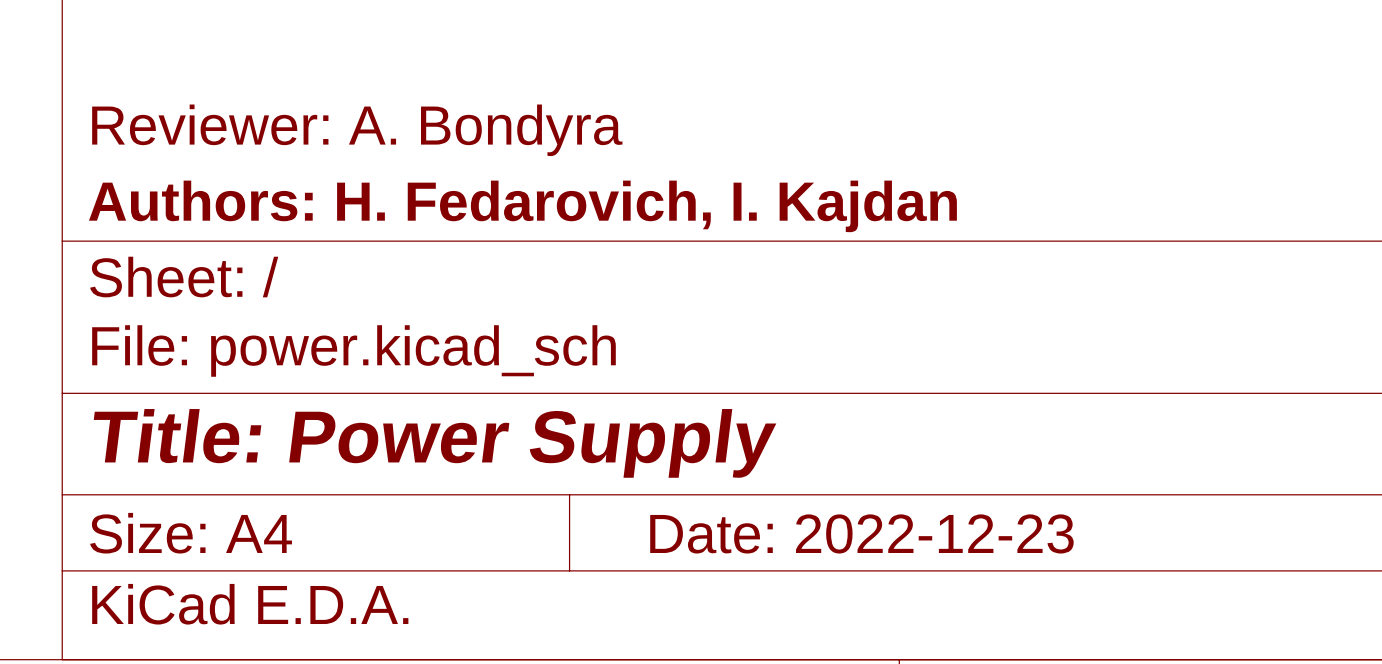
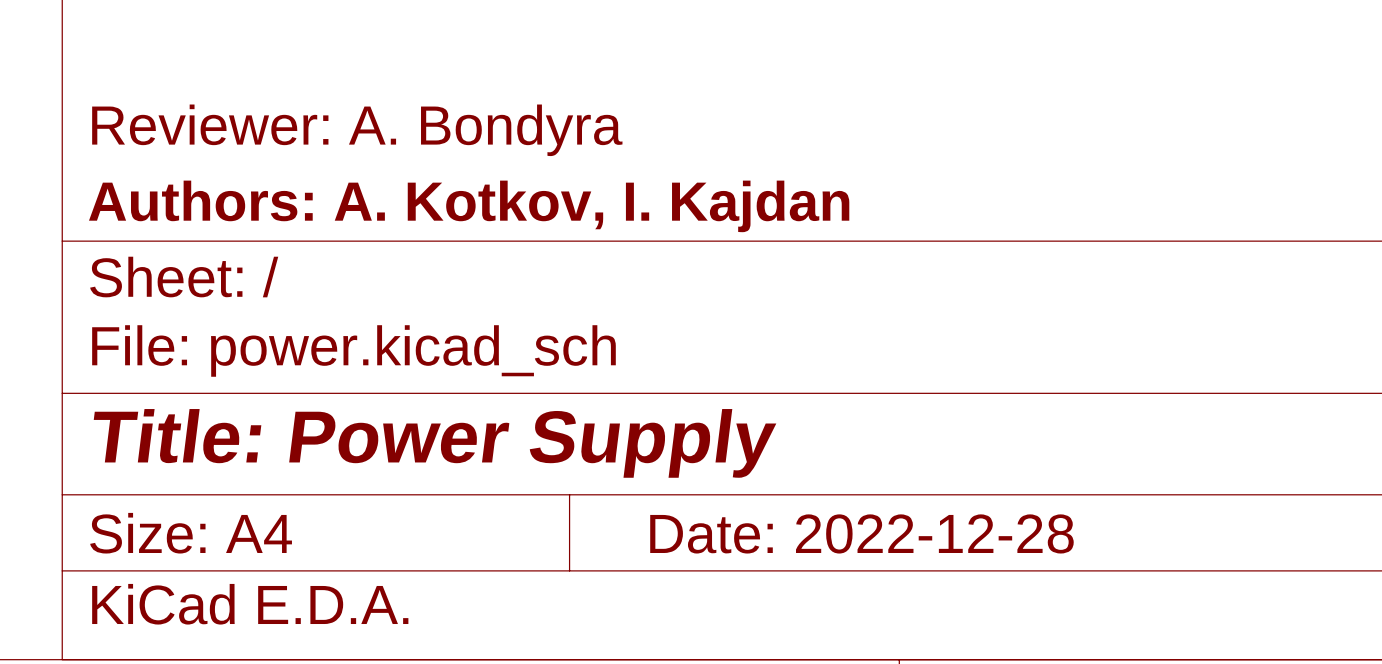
title block: Authors: H. Fedarovich, I. Kajdan (522, 206) -> Authors: A. Kotkov, I. Kajdan (469, 206)
title block: Date: 2022-12-23 (861, 533) -> Date: 2022-12-28 (861, 533)

